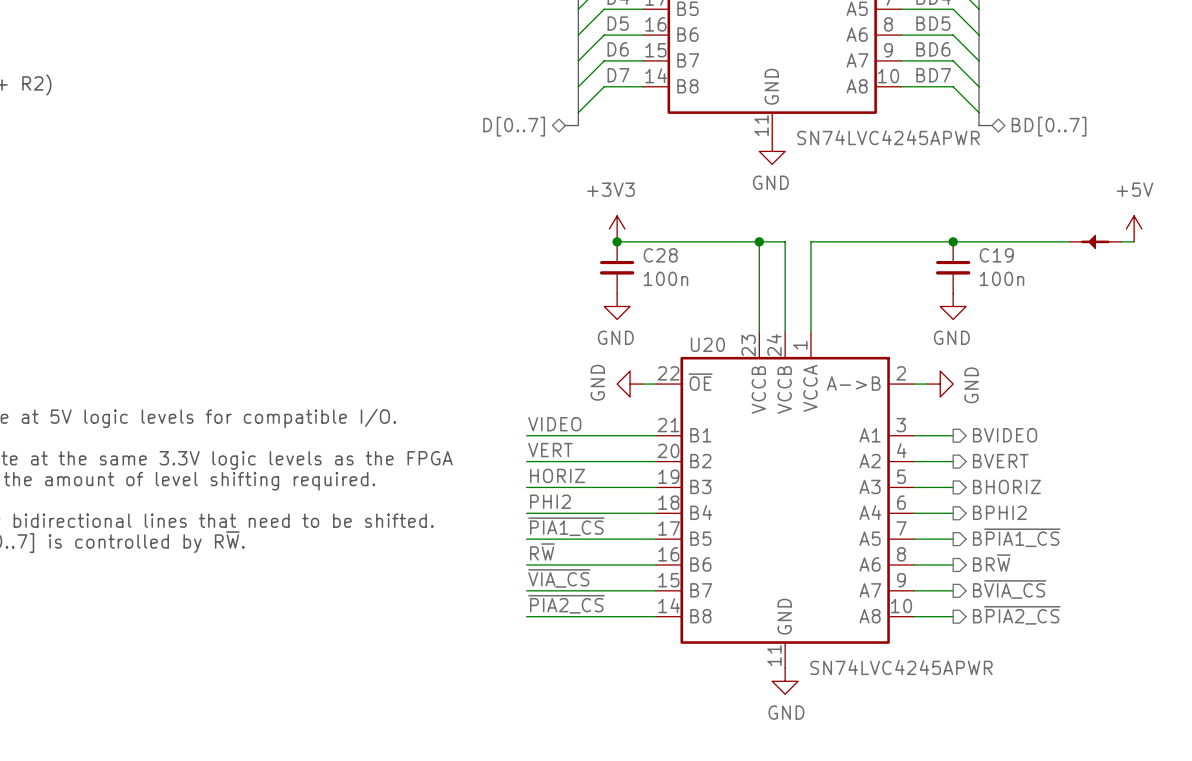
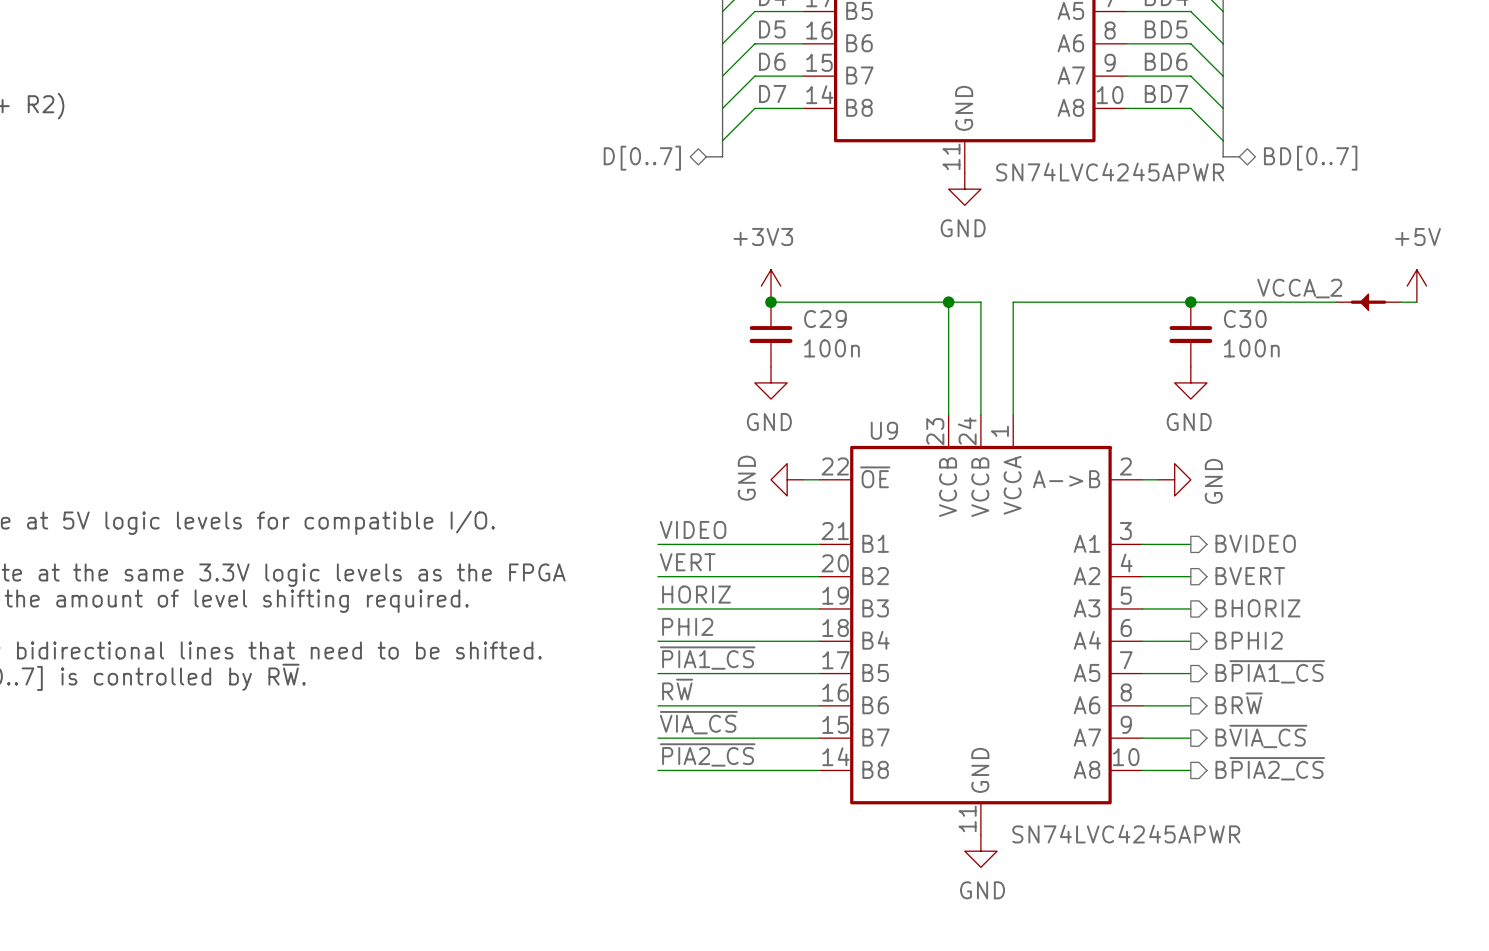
label: none -> VCCA_2 (1299, 288)
C28 name: C28 (660, 255) -> C29 (825, 319)
C19 name: C19 (996, 255) -> C30 (1245, 319)
U20 name: U20 (707, 344) -> U9 (884, 430)

